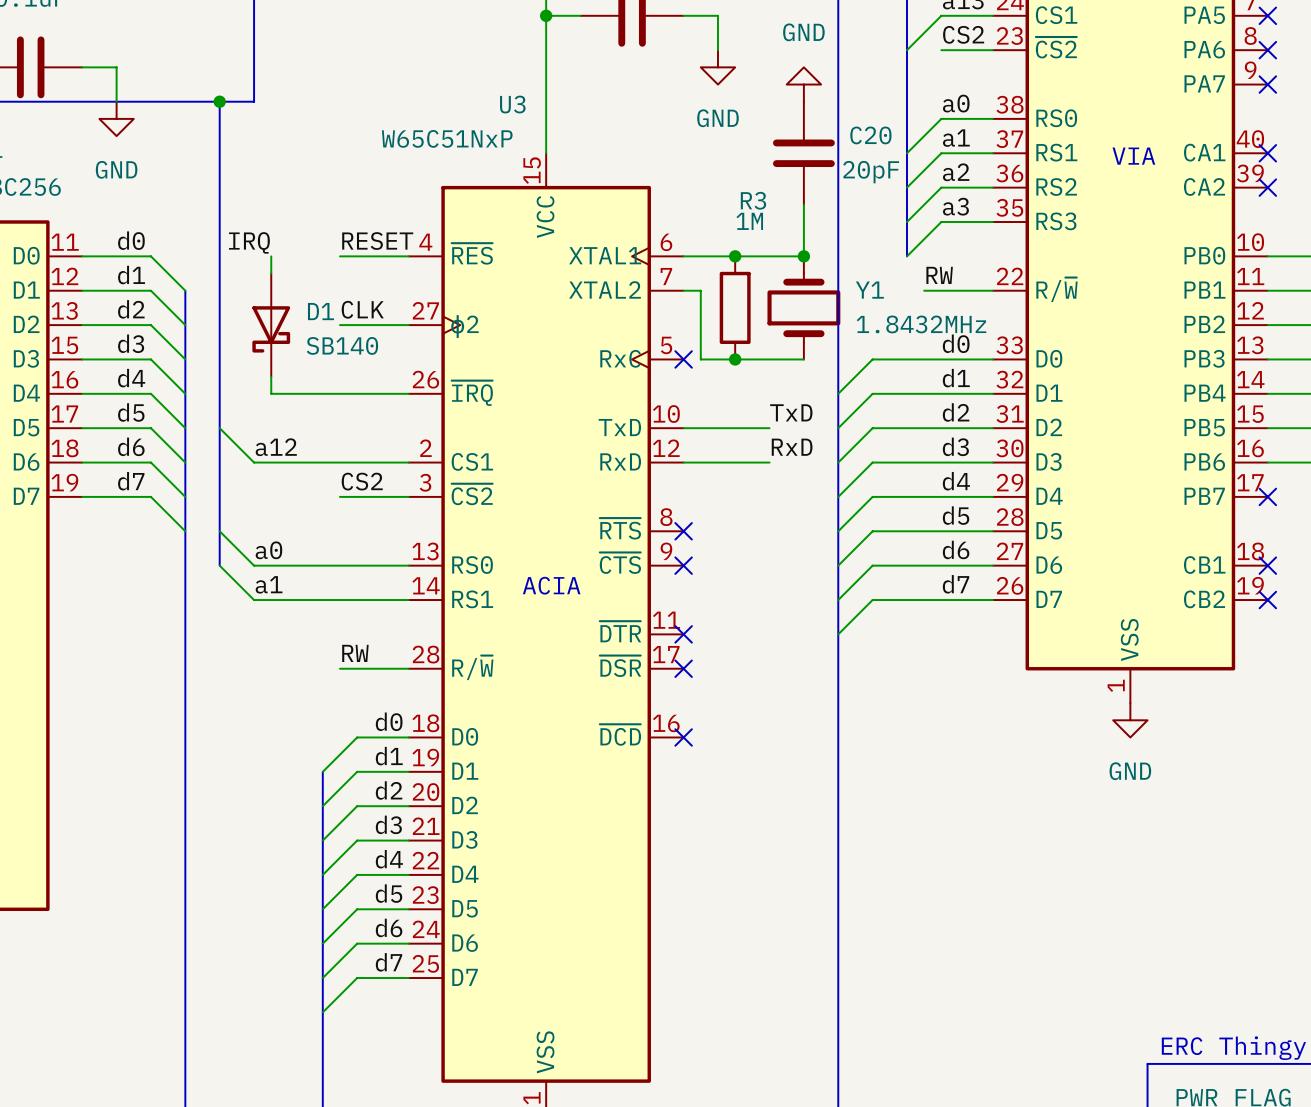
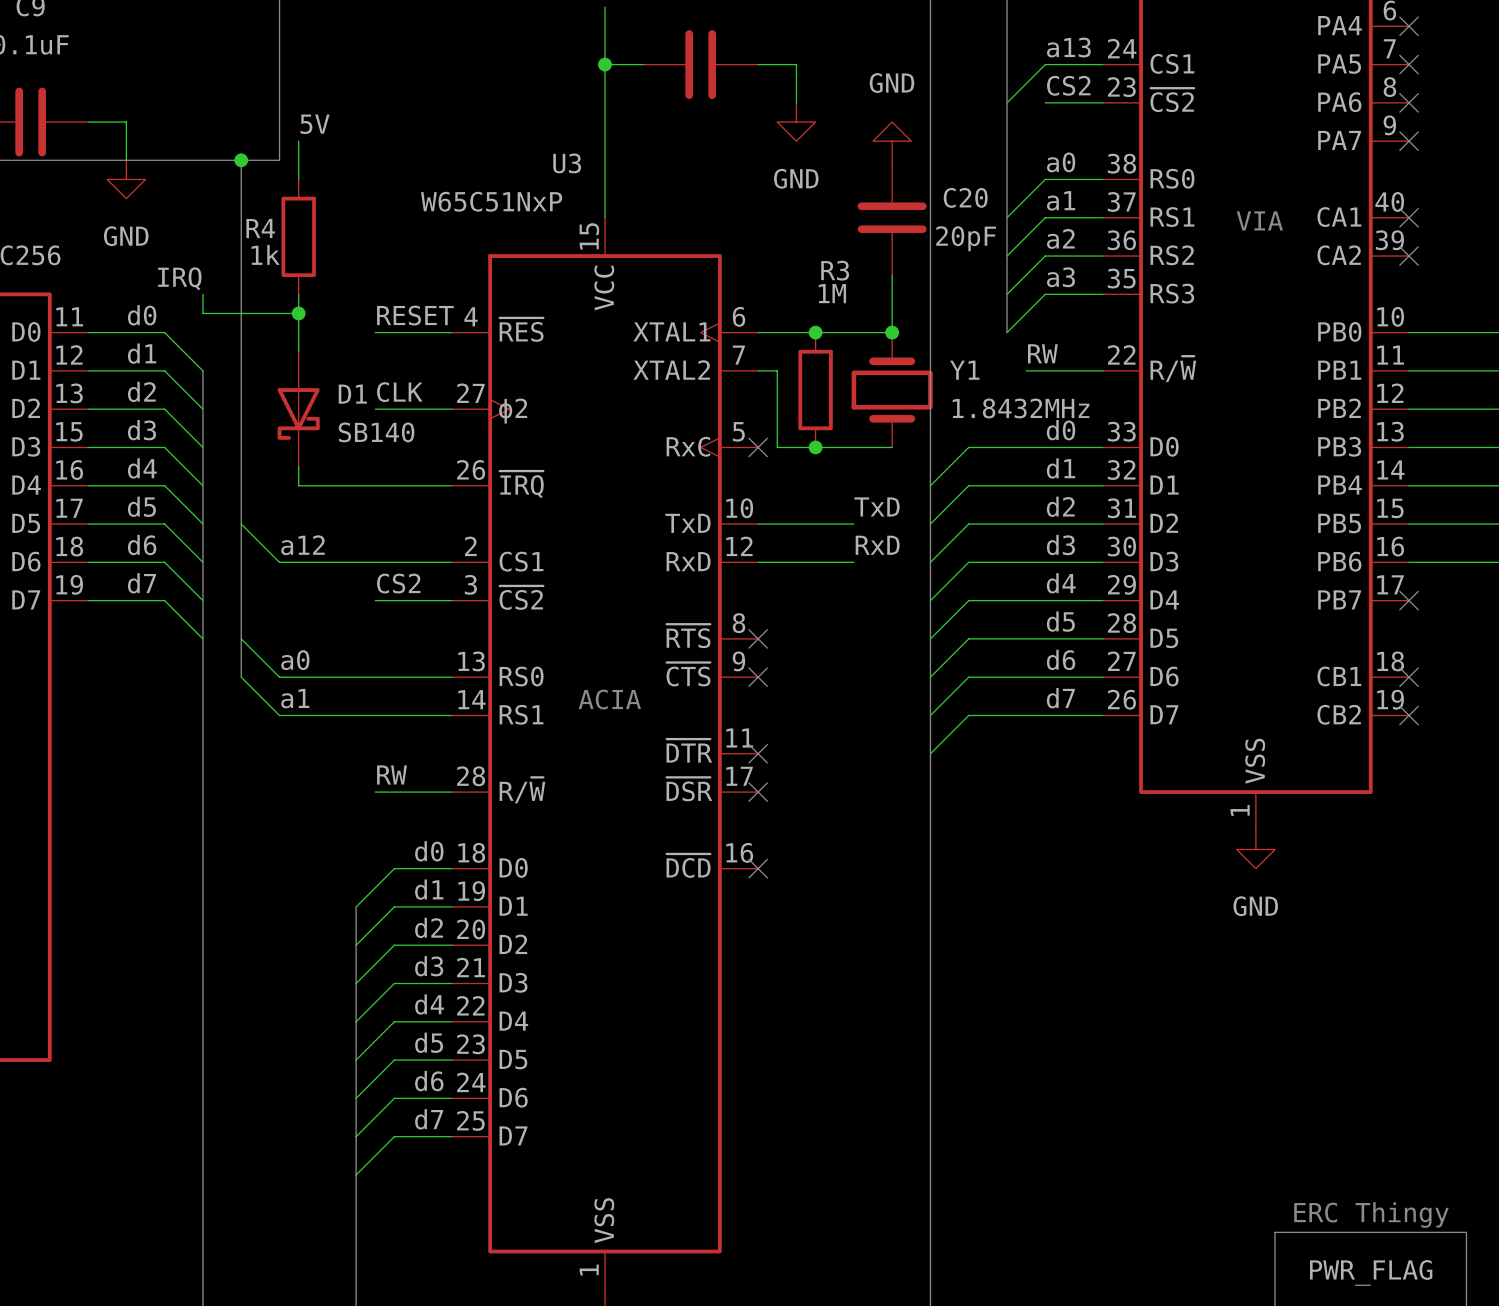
label: none -> 5V (315, 124)
wire: none -> (298, 141) (298, 179)
R4: none -> 1k (298, 236)
wire: none -> (202, 294) (202, 313) (298, 313)
wire: none -> (298, 294) (298, 332)
junction: none -> (298, 313)
label position: IRQ (249, 242) -> IRQ (179, 278)

